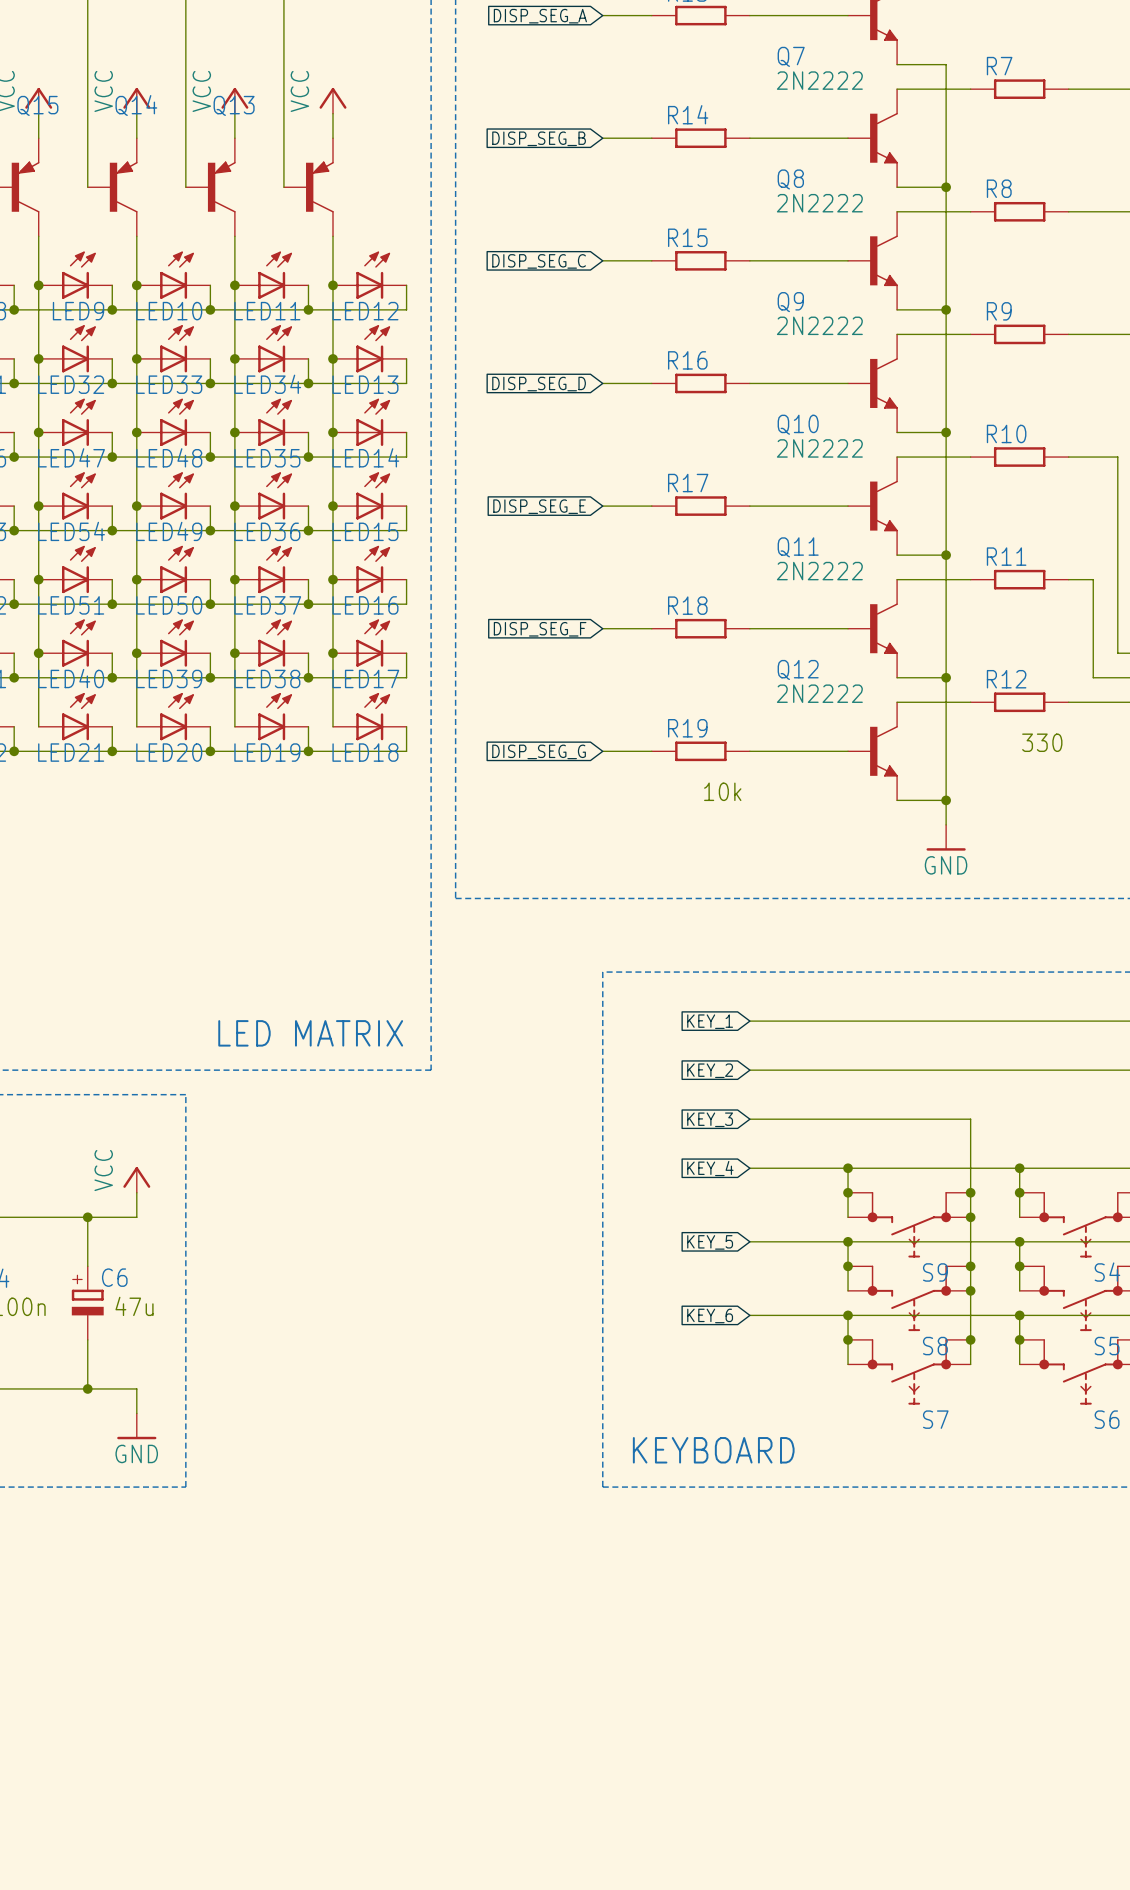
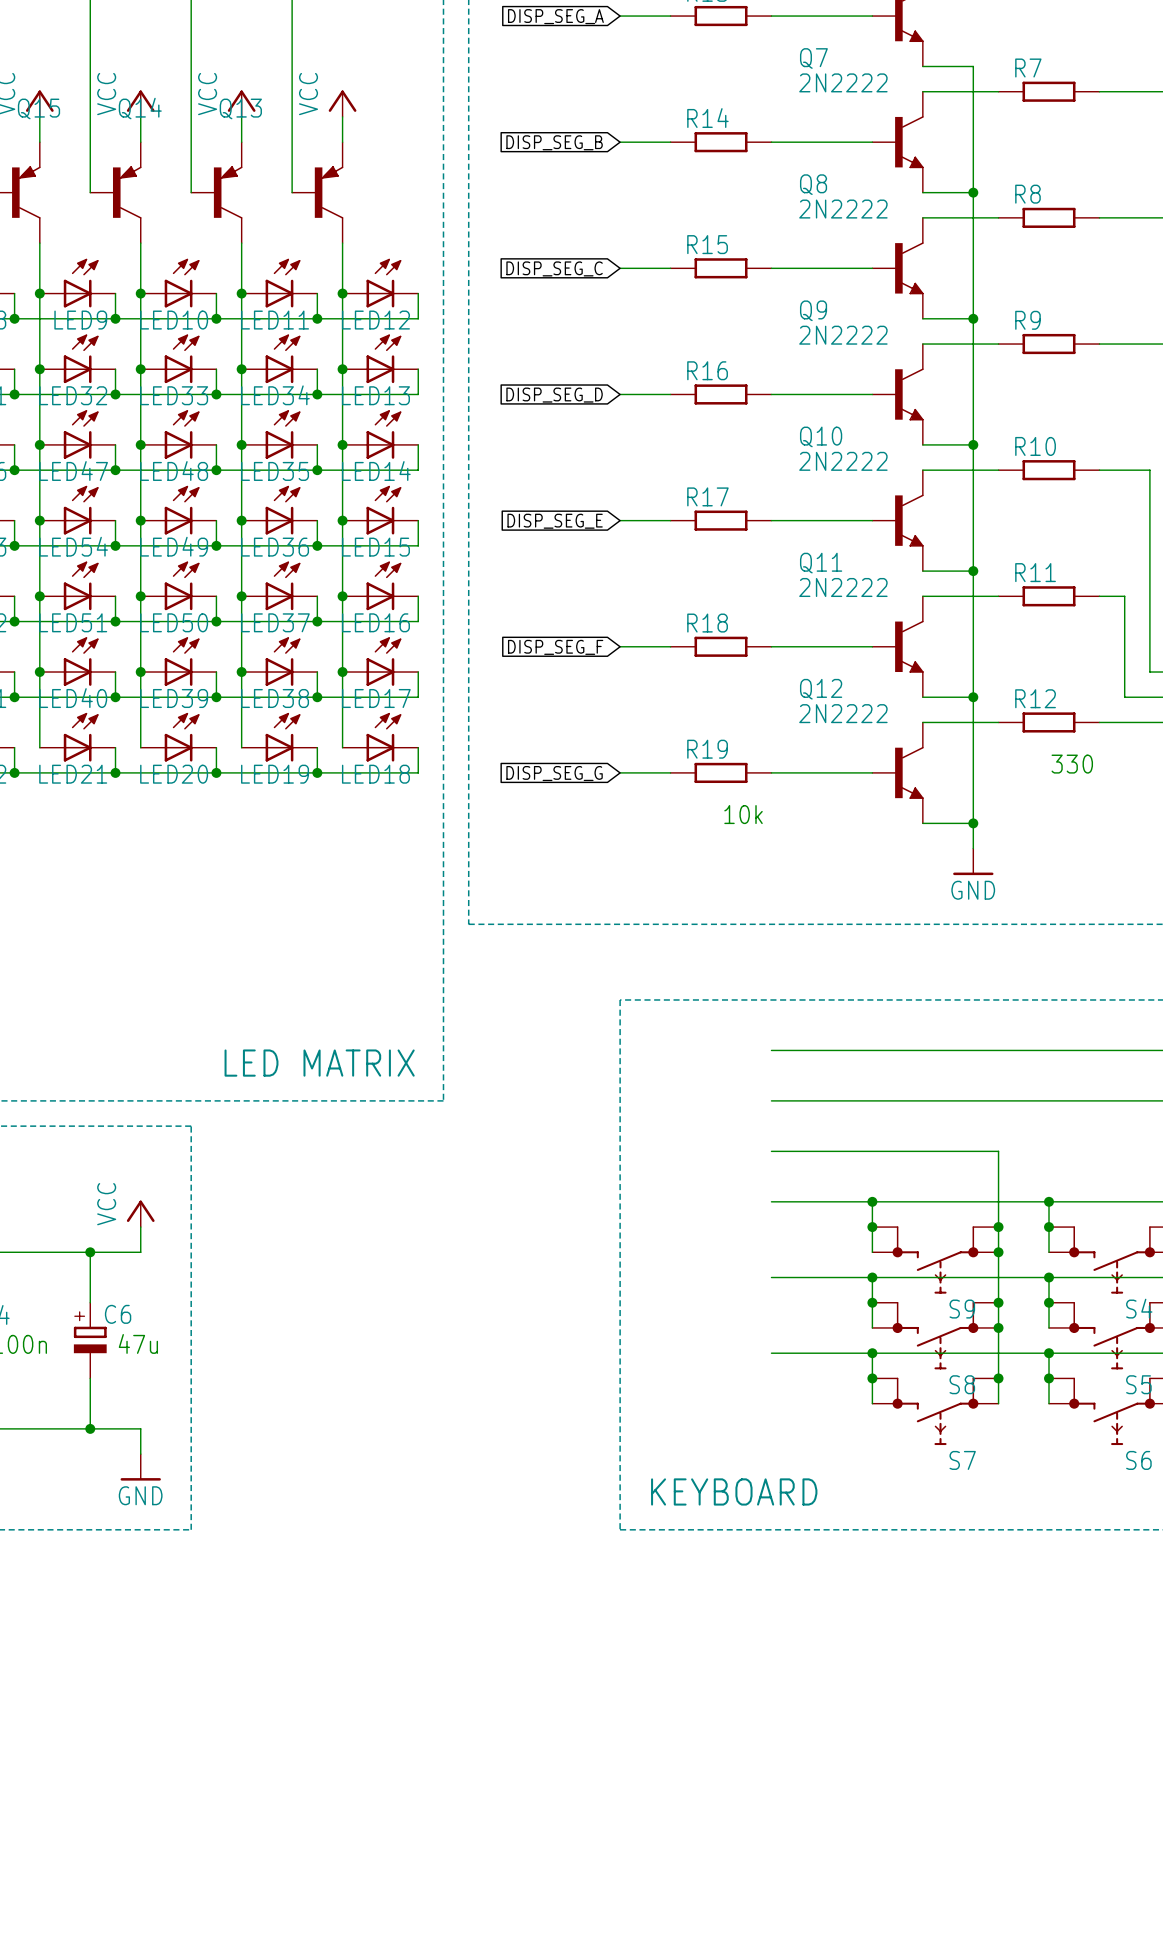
global label: KEY_1 (710, 1021) -> none
global label: KEY_2 (710, 1070) -> none
global label: KEY_3 (710, 1119) -> none
global label: KEY_4 (710, 1168) -> none
global label: KEY_5 (710, 1242) -> none
global label: KEY_6 (710, 1315) -> none

